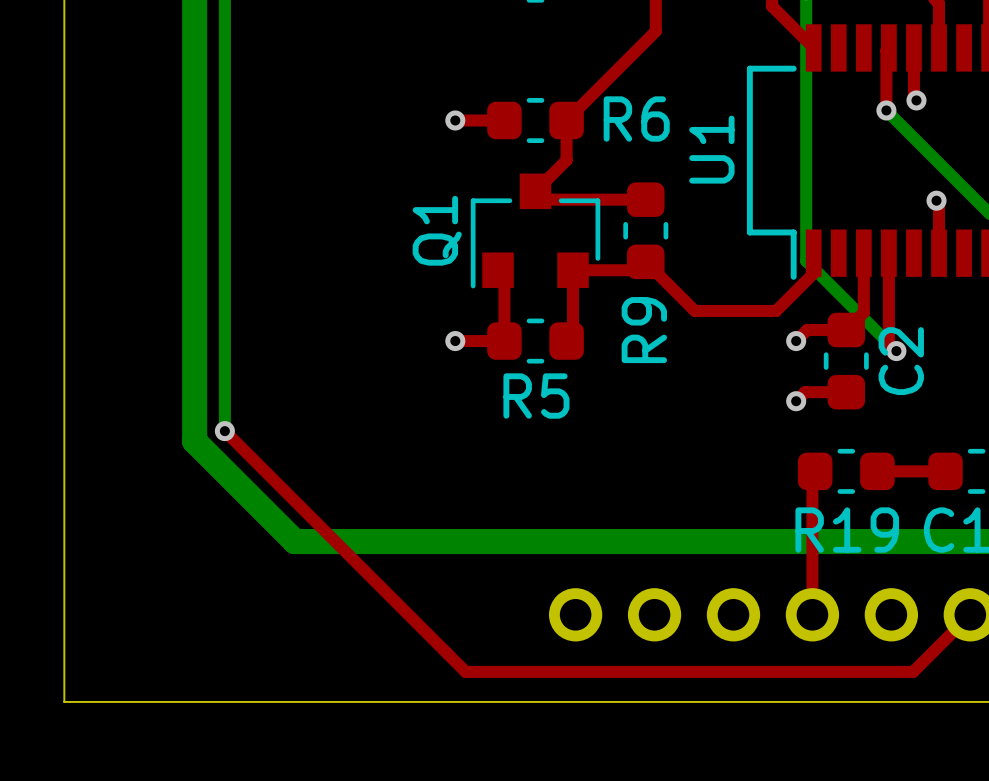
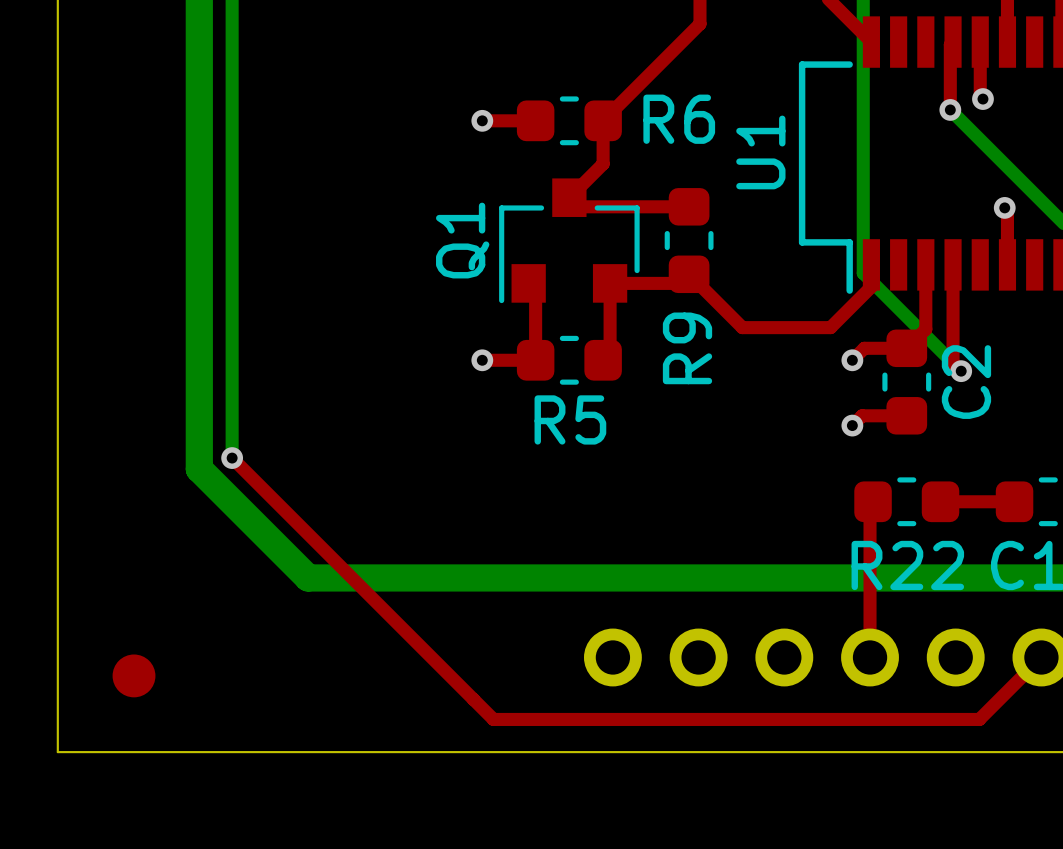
R19 name: R19 (847, 530) -> R22 (907, 565)
part: none -> (134, 675)

